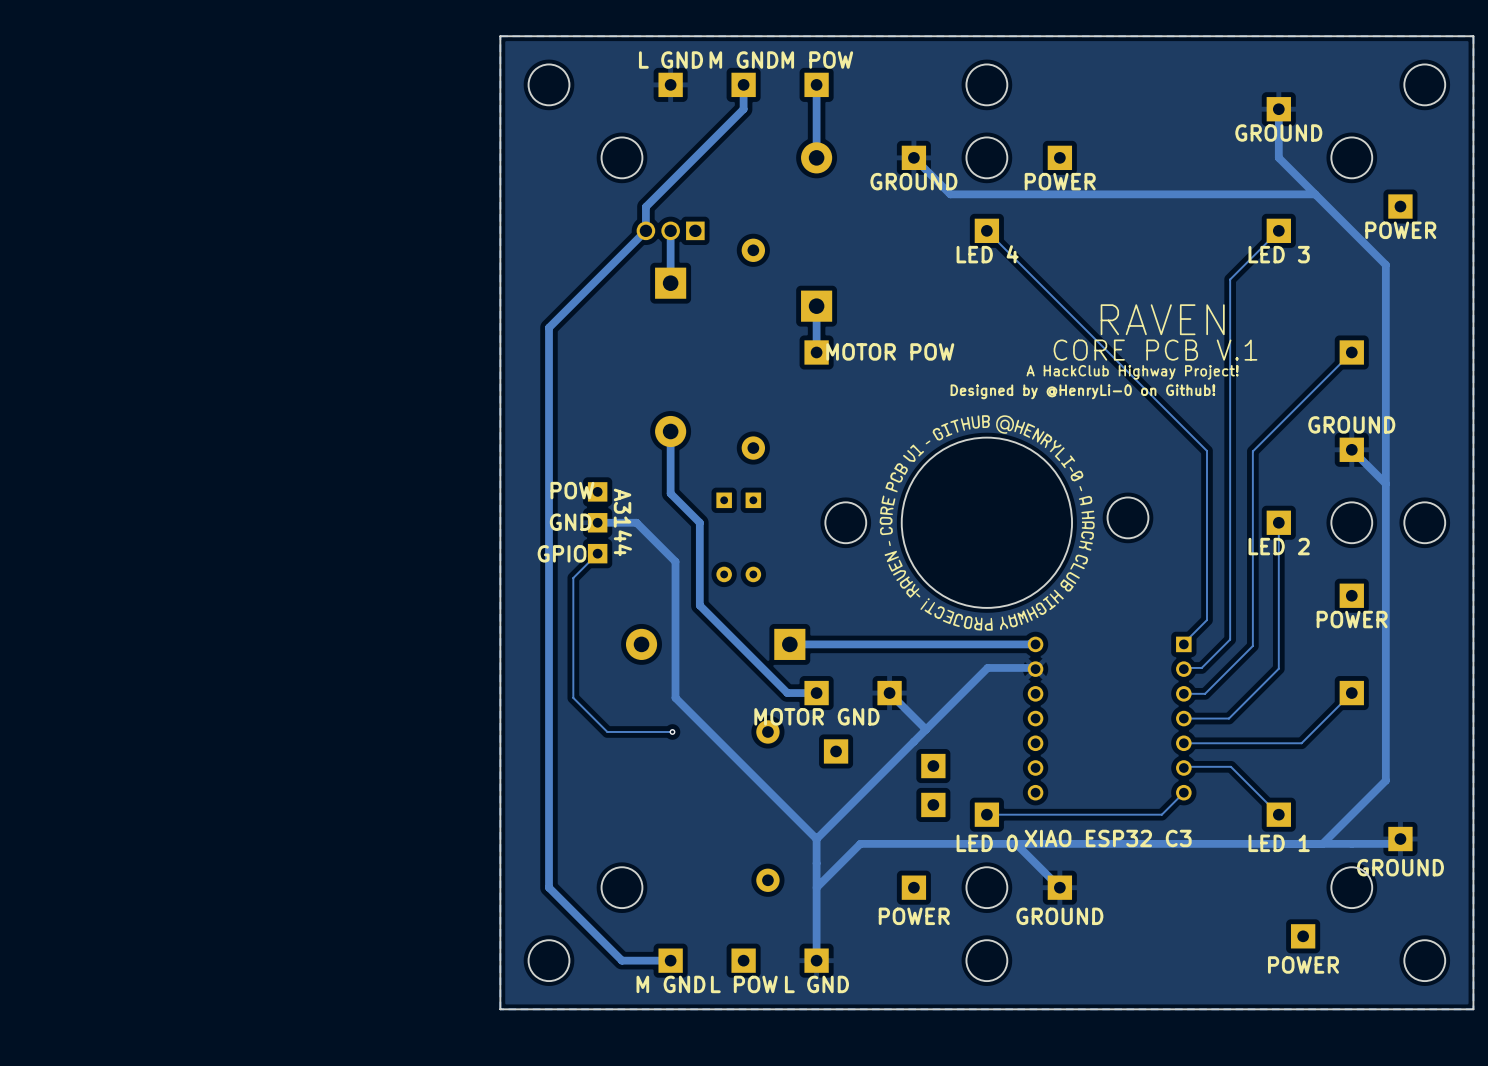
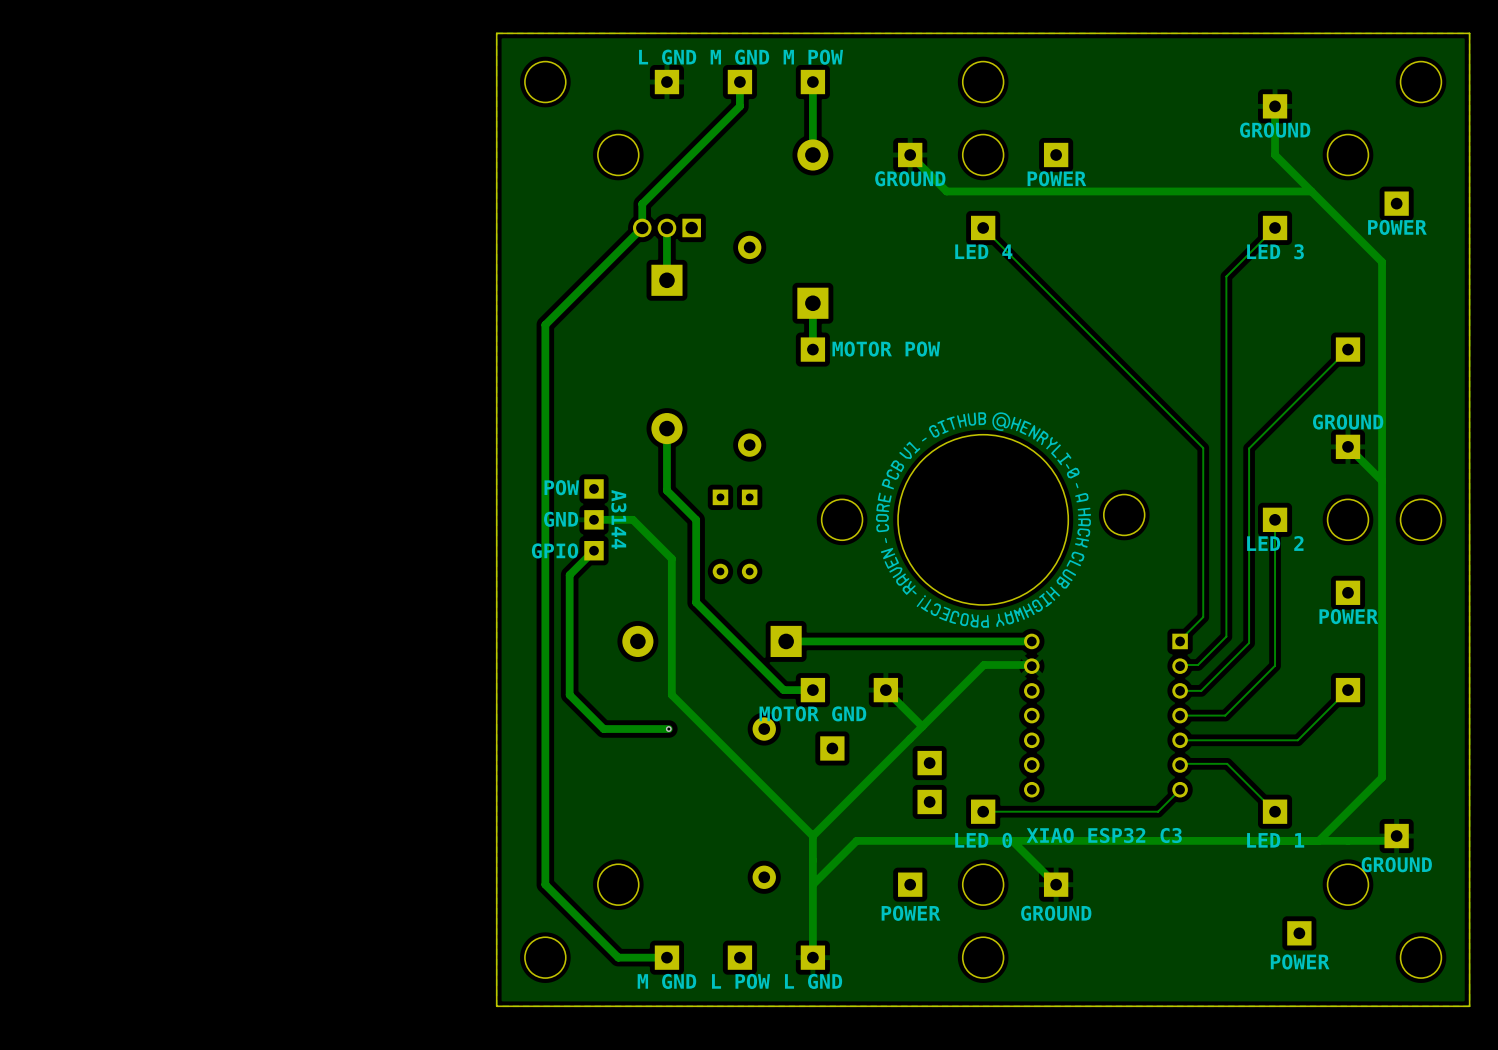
text: RAVEN (1162, 319) -> none
text: CORE PCB V.1 (1155, 350) -> none
text: A HackClub Highway Project! (1132, 372) -> none
text: Designed by @HenryLi-0 on Github! (1082, 391) -> none
track width: thin (597, 553) (573, 577) (573, 697) (607, 731) (672, 731) -> thick (593, 550) (569, 575) (569, 694) (603, 729) (668, 729)

